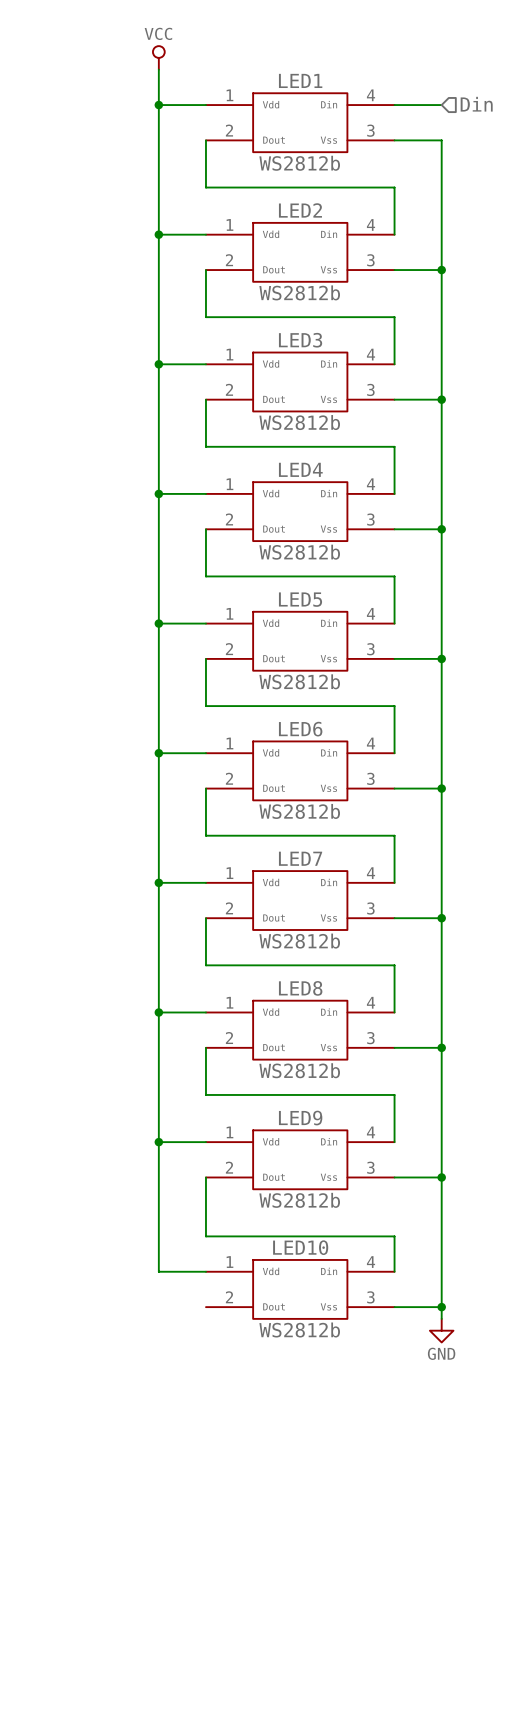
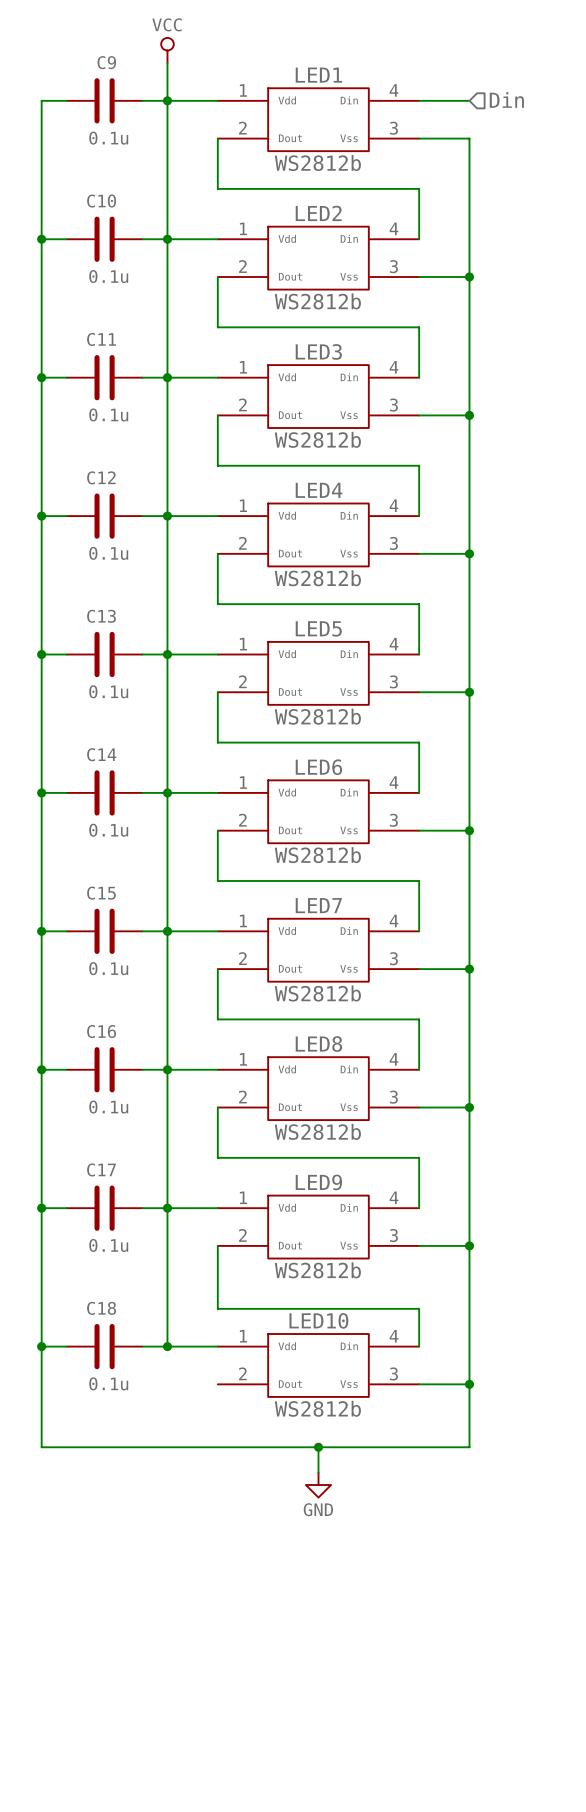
wire: none -> (66, 100) (41, 100) (41, 1447) (469, 1447) (469, 1396)
C9: none -> 0.1u (104, 100)
wire: none -> (142, 100) (167, 100)
wire: none -> (41, 239) (66, 239)
junction: none -> (41, 239)
C10: none -> 0.1u (104, 239)
wire: none -> (142, 239) (167, 239)
wire: none -> (41, 377) (66, 377)
junction: none -> (41, 377)
C11: none -> 0.1u (104, 377)
wire: none -> (142, 377) (167, 377)
wire: none -> (41, 516) (66, 516)
junction: none -> (41, 516)
C12: none -> 0.1u (104, 516)
wire: none -> (142, 516) (167, 516)
wire: none -> (41, 654) (66, 654)
junction: none -> (41, 654)
C13: none -> 0.1u (104, 654)
wire: none -> (142, 654) (167, 654)
wire: none -> (41, 792) (66, 792)
junction: none -> (41, 792)
C14: none -> 0.1u (104, 792)
wire: none -> (142, 792) (167, 792)
wire: none -> (41, 931) (66, 931)
junction: none -> (41, 931)
C15: none -> 0.1u (104, 931)
wire: none -> (142, 931) (167, 931)
wire: none -> (41, 1069) (66, 1069)
junction: none -> (41, 1069)
C16: none -> 0.1u (104, 1069)
wire: none -> (142, 1069) (167, 1069)
wire: none -> (41, 1208) (66, 1208)
junction: none -> (41, 1208)
C17: none -> 0.1u (104, 1208)
wire: none -> (142, 1208) (167, 1208)
wire: none -> (41, 1346) (66, 1346)
junction: none -> (41, 1346)
C18: none -> 0.1u (104, 1346)
wire: none -> (142, 1346) (167, 1346)
junction: none -> (167, 1346)
power symbol position: GND (441, 1330) -> GND (318, 1485)
wire: none -> (318, 1447) (318, 1472)
junction: none -> (318, 1447)

